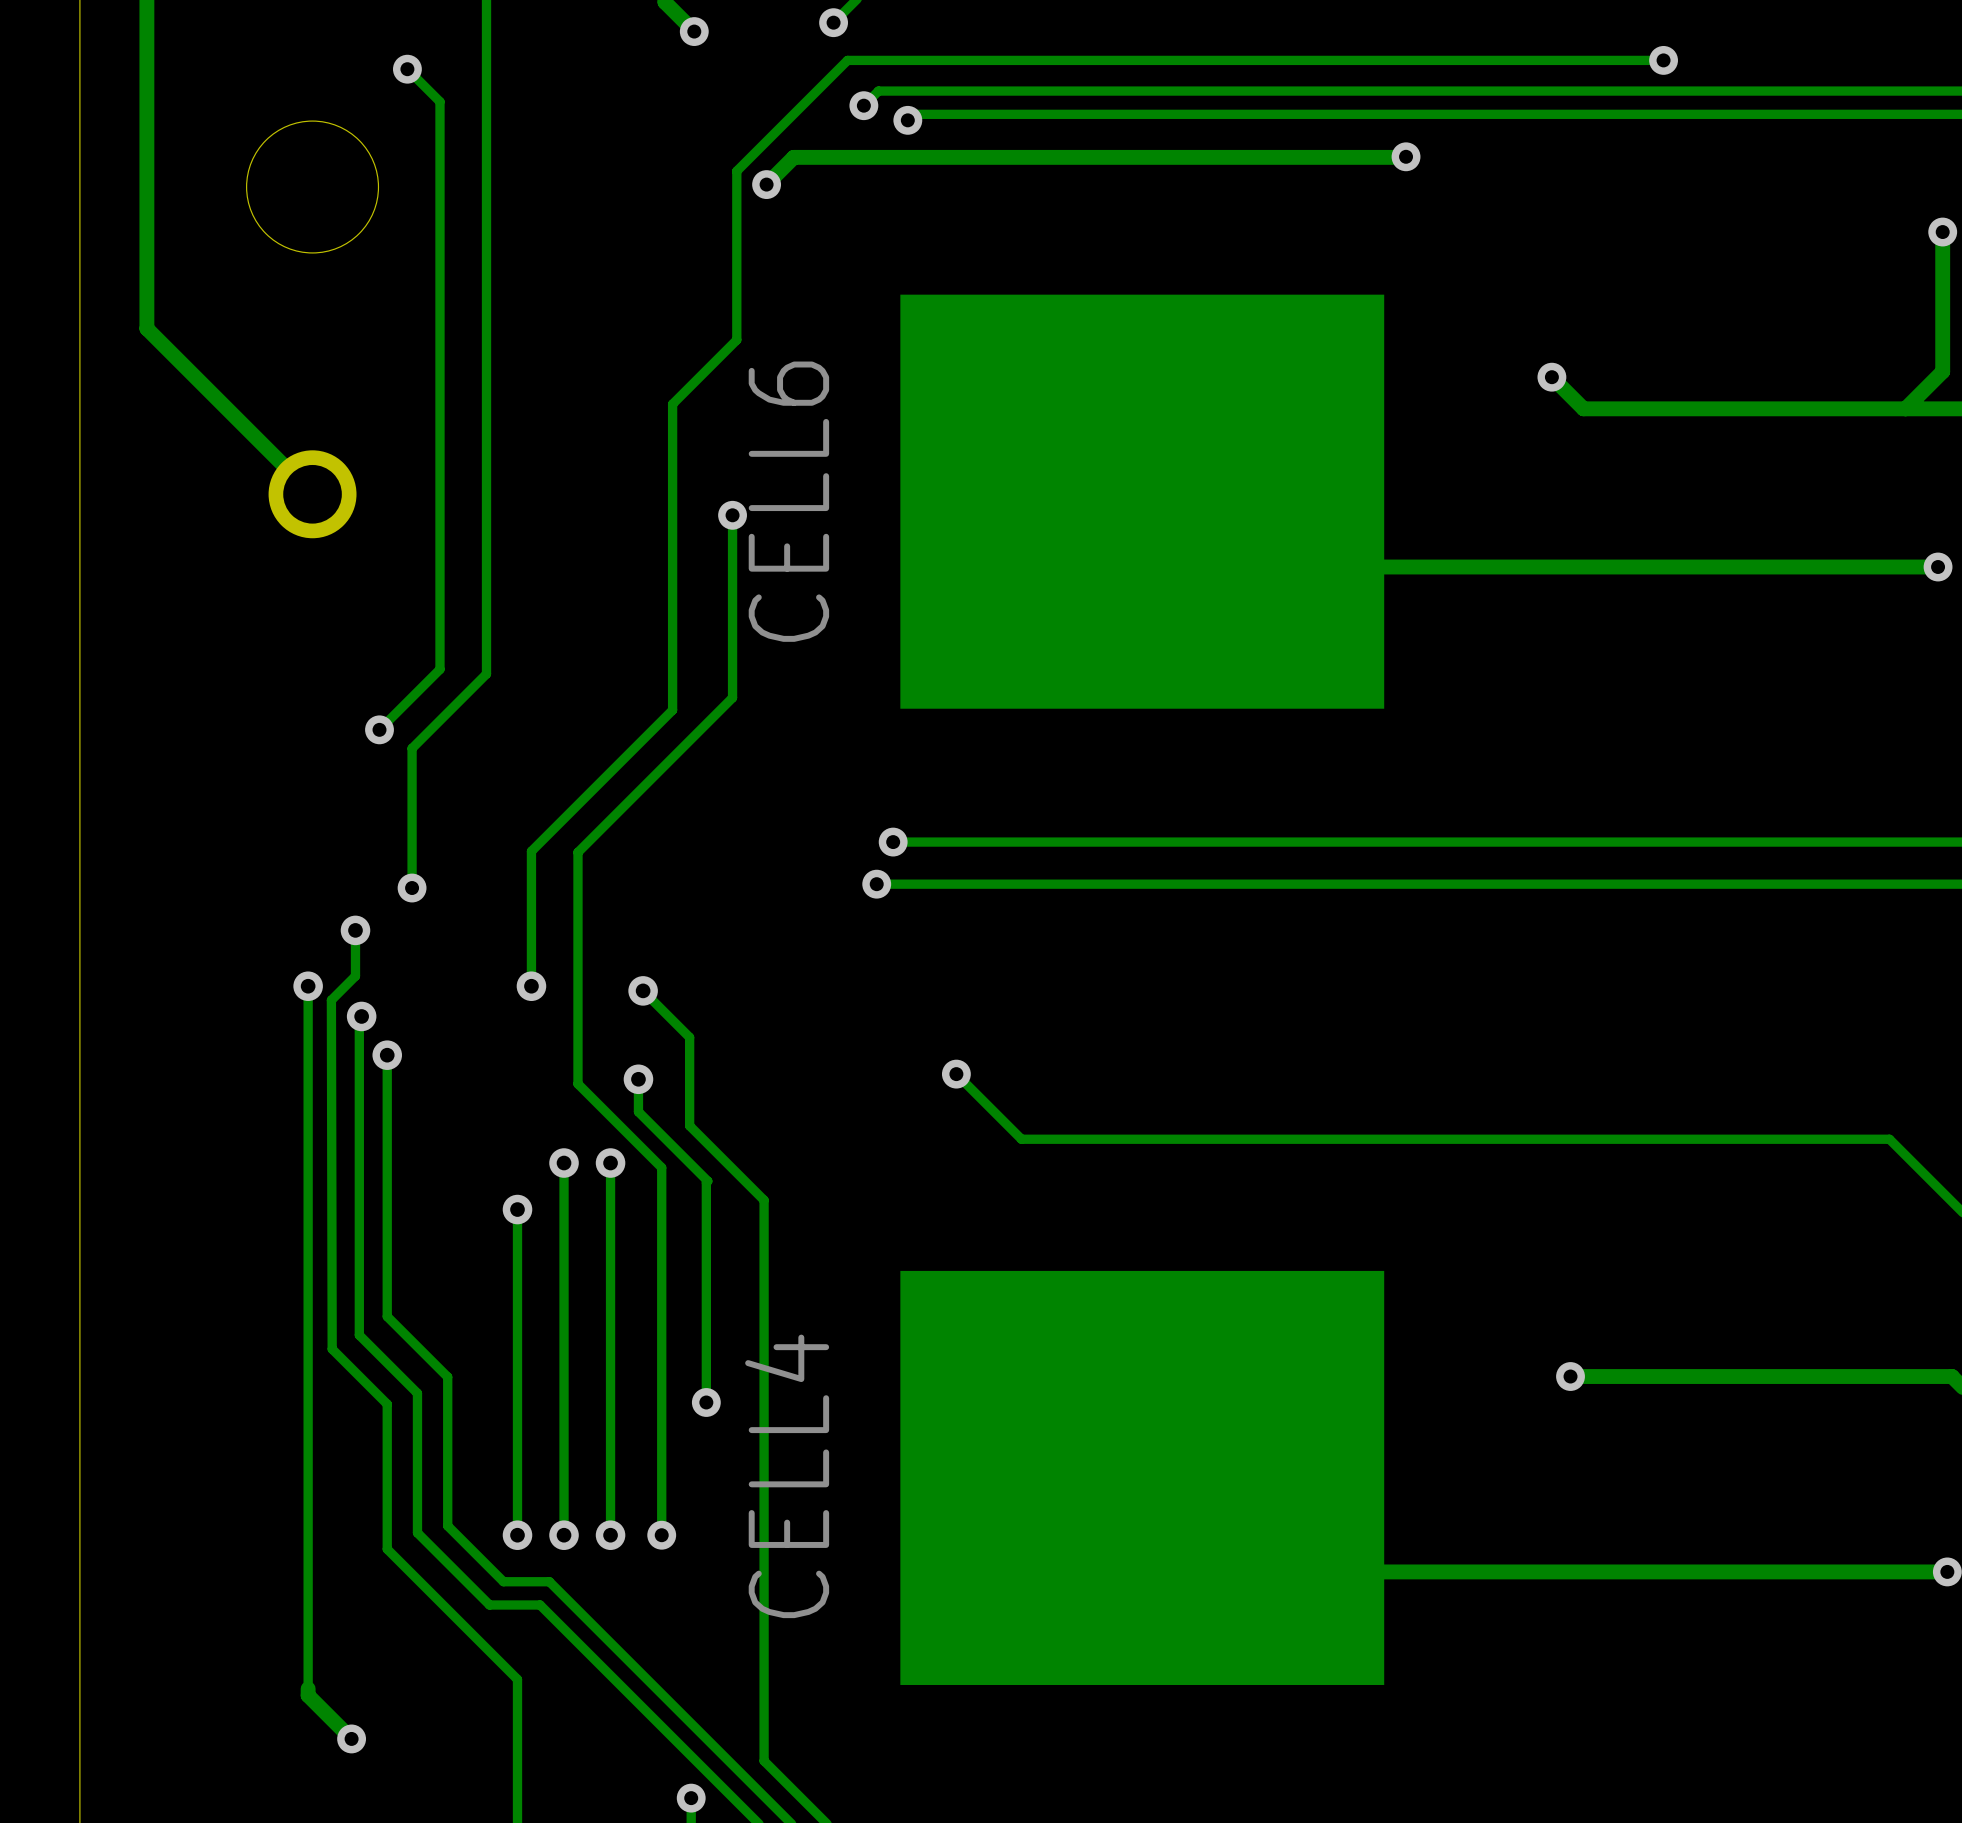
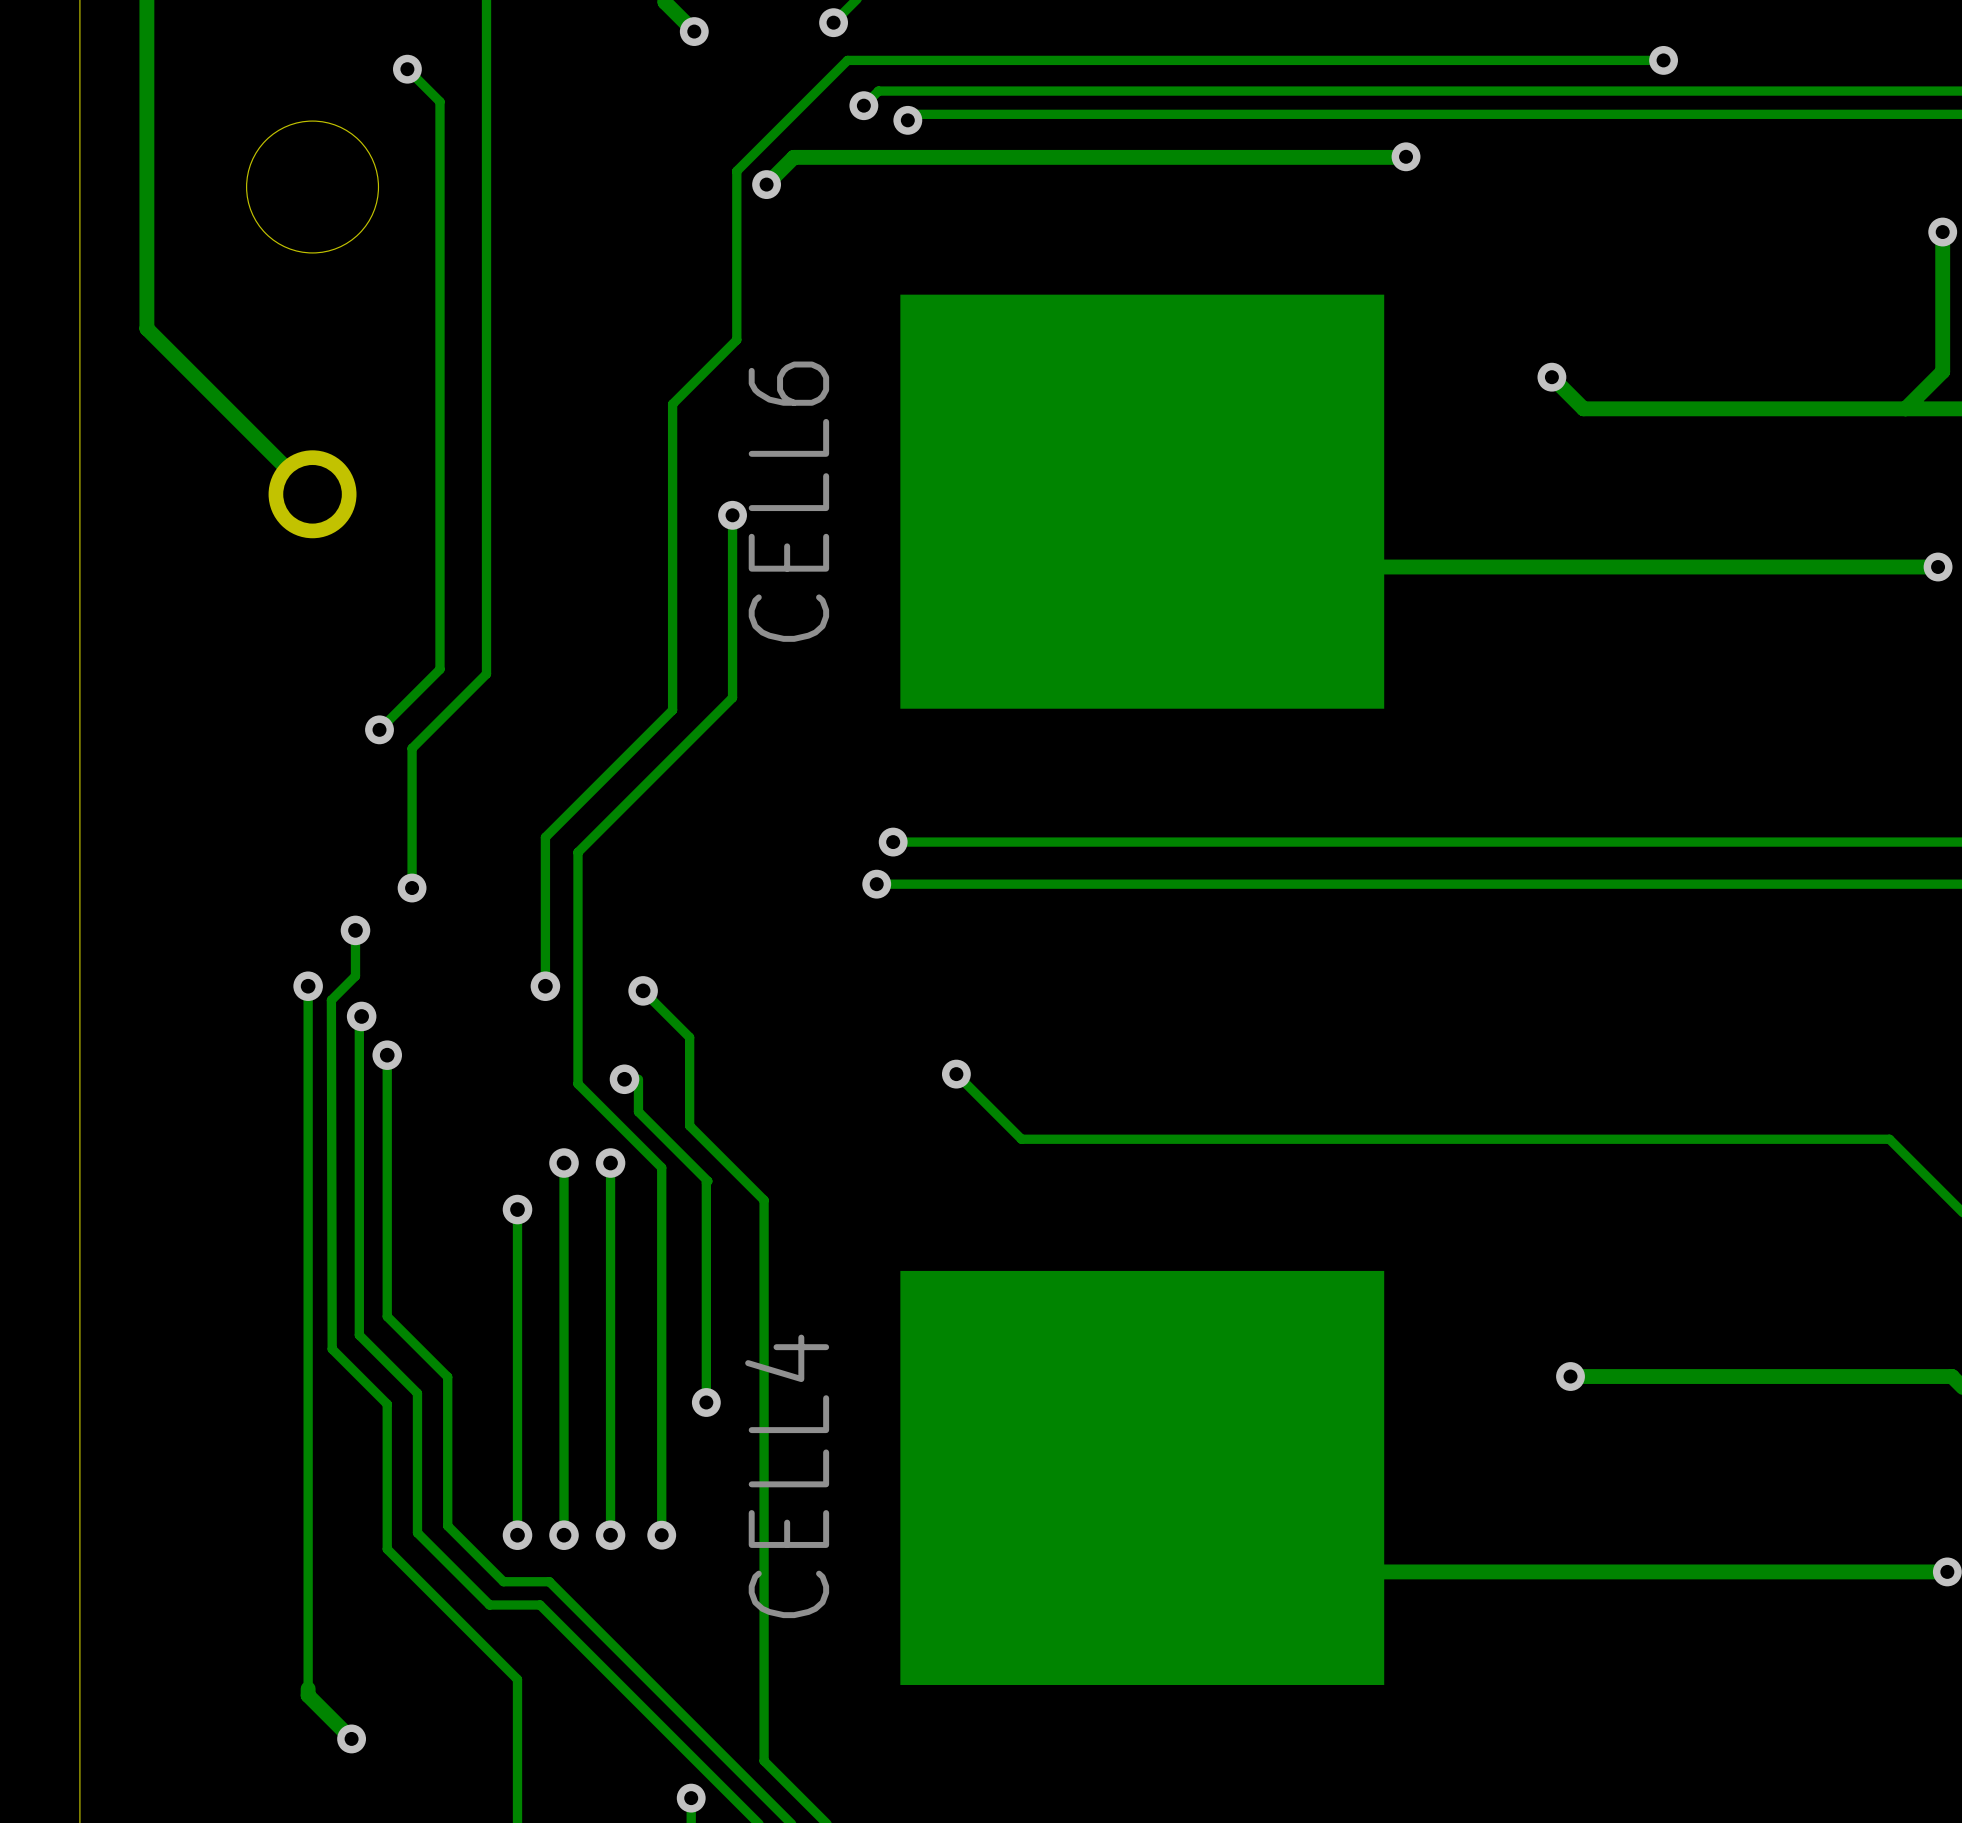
track: (545, 837) (531, 851) (531, 986) -> (545, 837) (545, 986)
via position: (531, 986) -> (545, 986)
via position: (638, 1079) -> (624, 1079)

